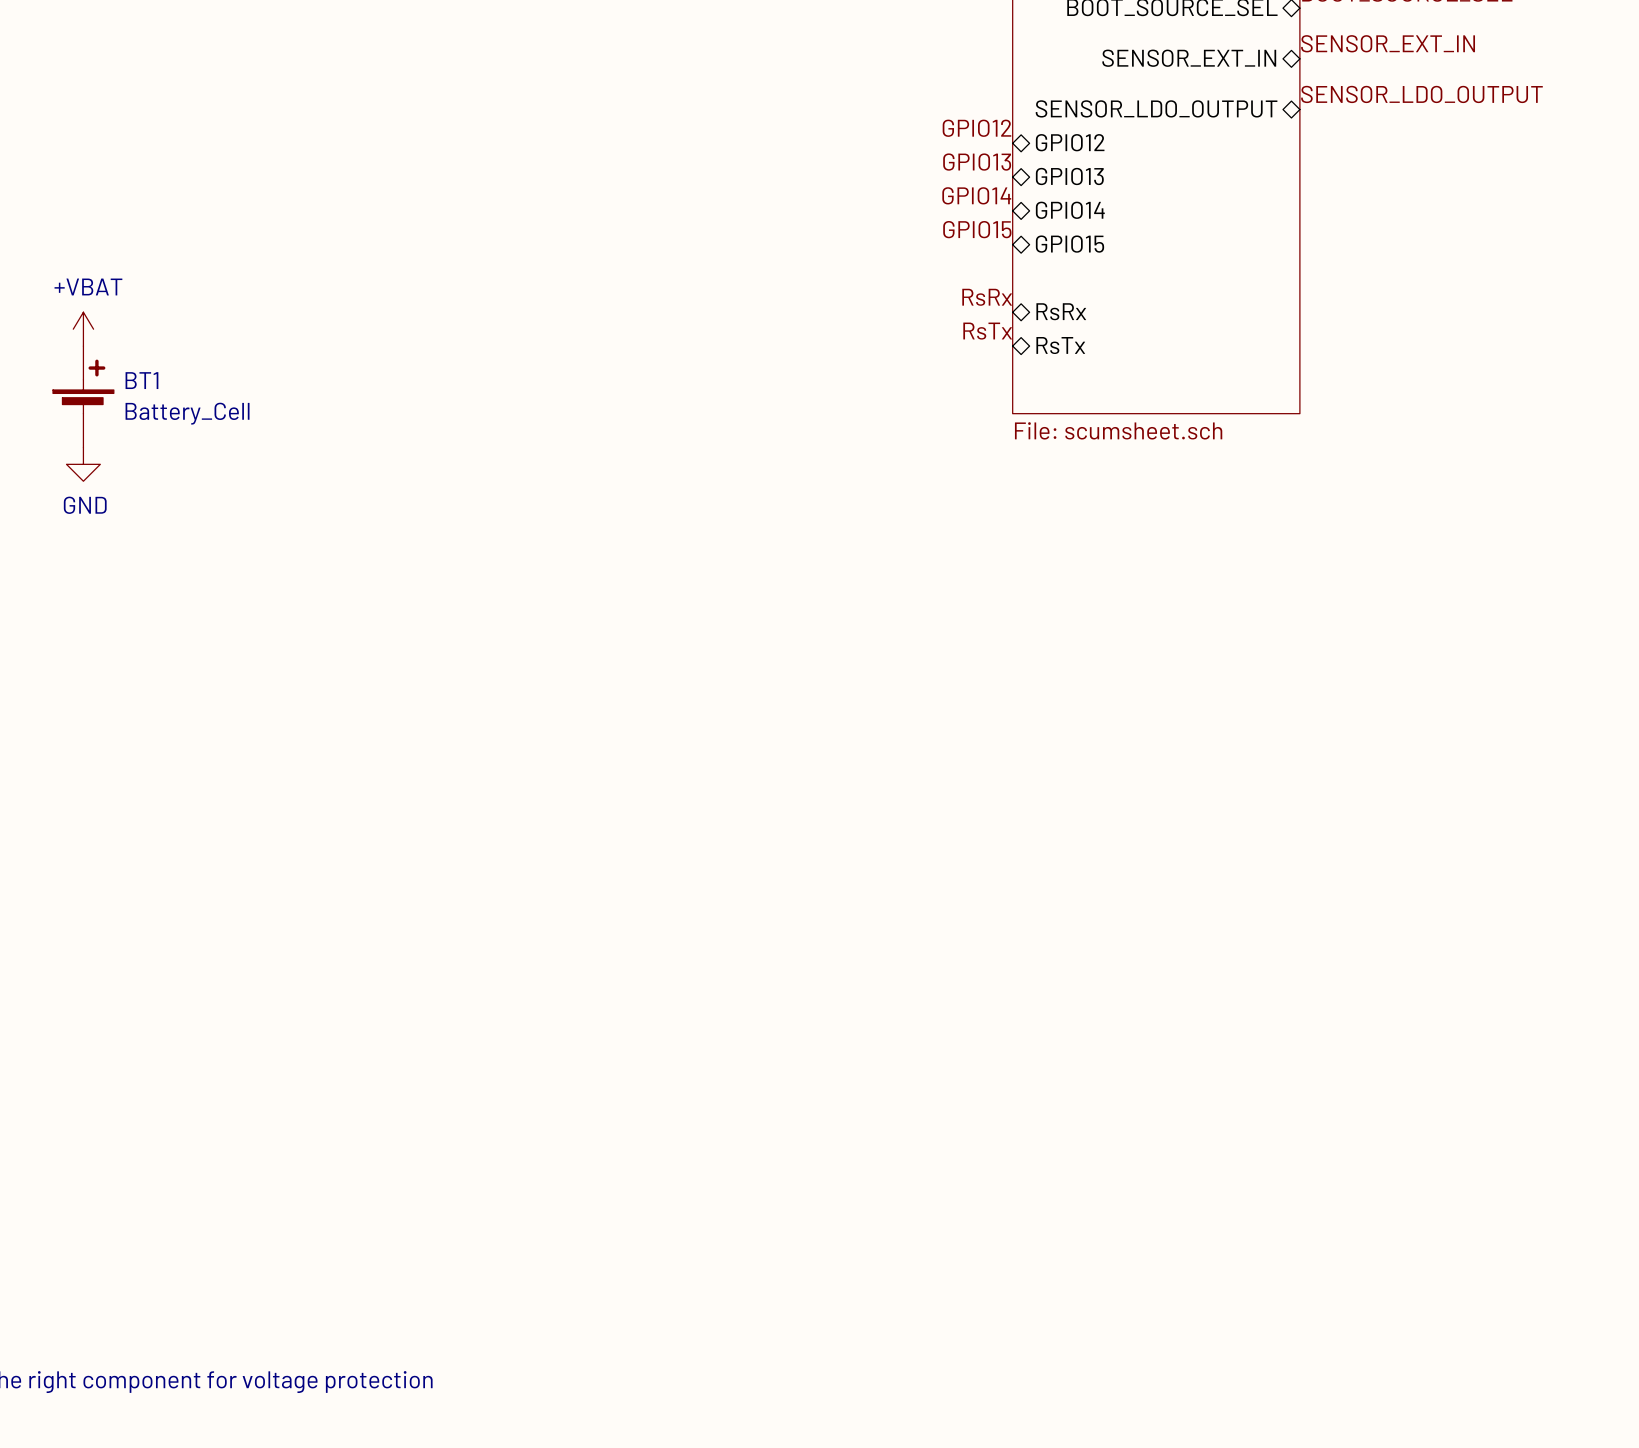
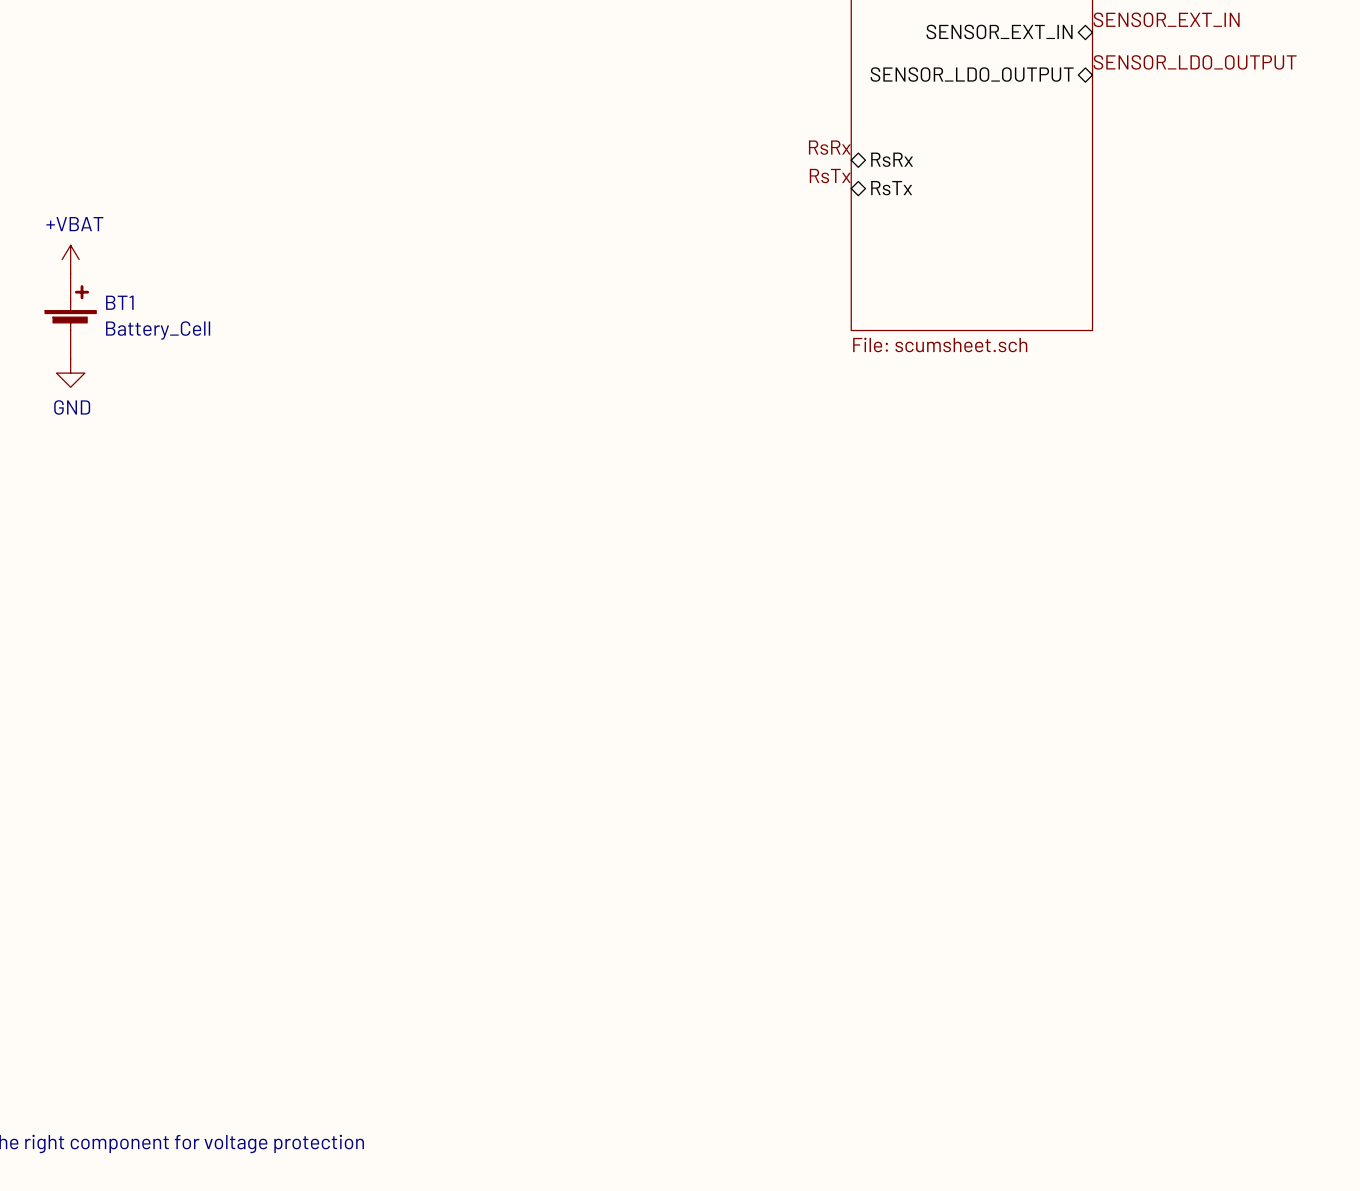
label: GPIO12 (976, 128) -> none
sheet pin: GPIO12 (1070, 142) -> none
label: GPIO13 (977, 162) -> none
sheet pin: GPIO13 (1069, 176) -> none
label: GPIO14 (976, 195) -> RsRx (829, 147)
sheet pin: GPIO14 (1070, 210) -> RsRx (892, 159)
label: GPIO15 (977, 229) -> RsTx (830, 175)
sheet pin: GPIO15 (1070, 244) -> RsTx (891, 188)
label: RsRx (987, 297) -> none
sheet pin: RsRx (1061, 311) -> none
label: RsTx (987, 331) -> none
sheet pin: RsTx (1060, 345) -> none

